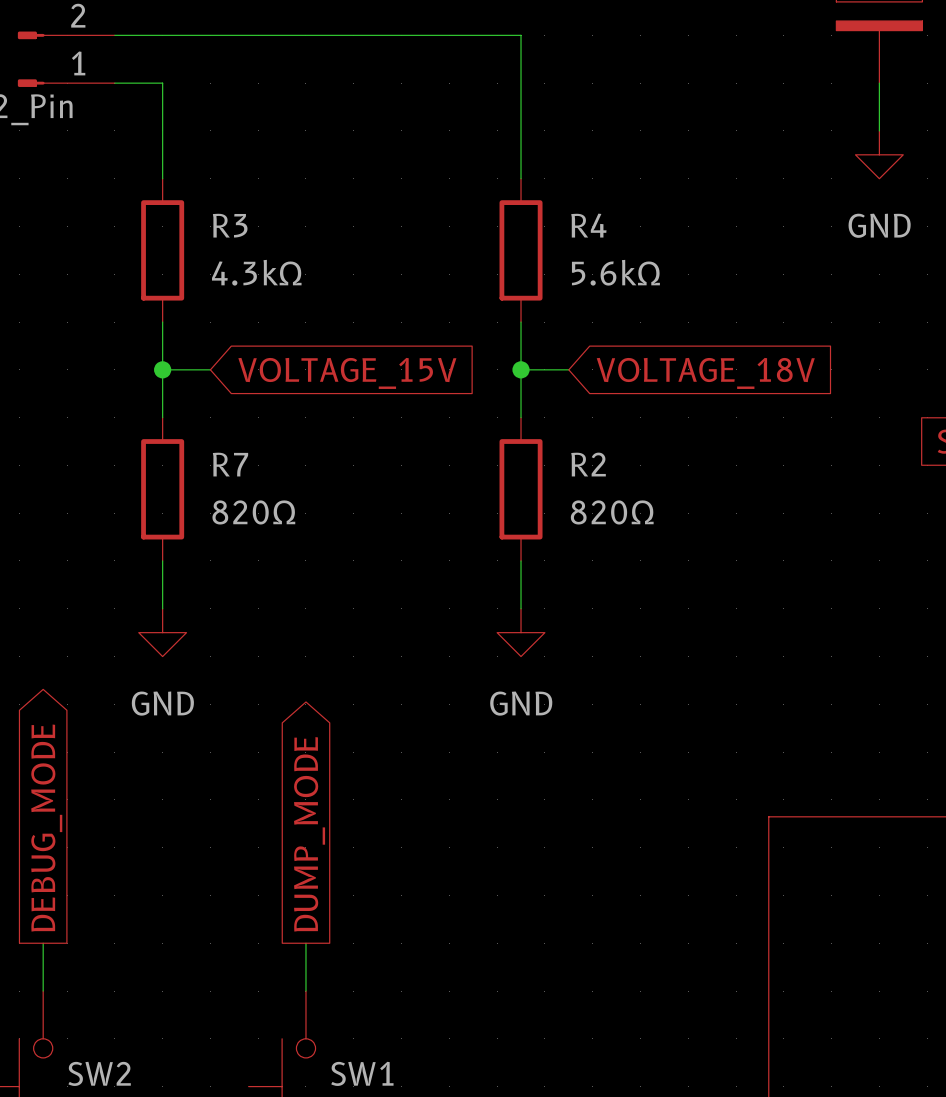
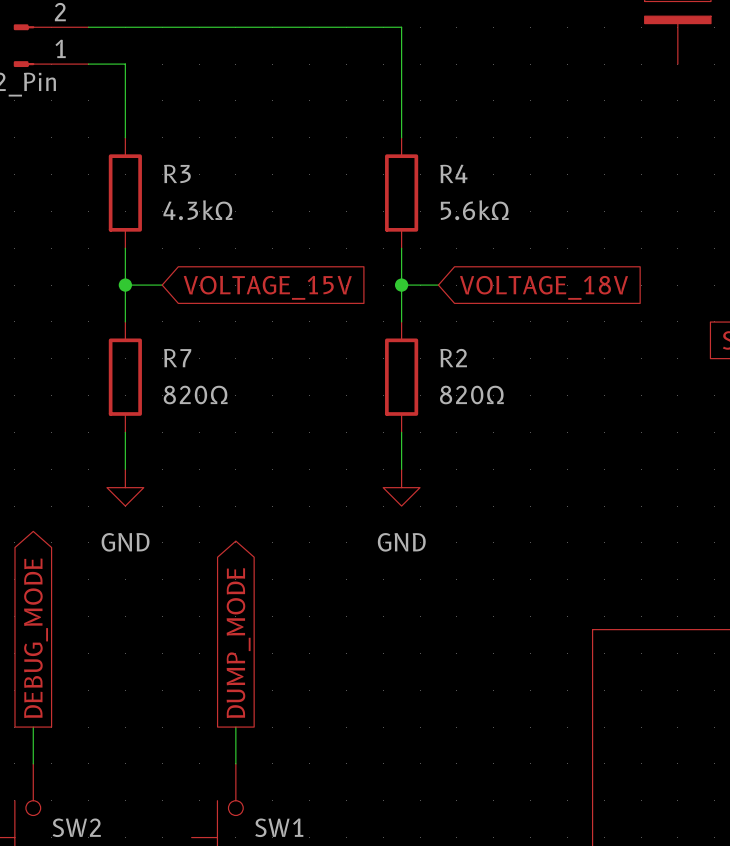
wire: (879, 83) (879, 130) -> none
power symbol: GND (879, 154) -> none

